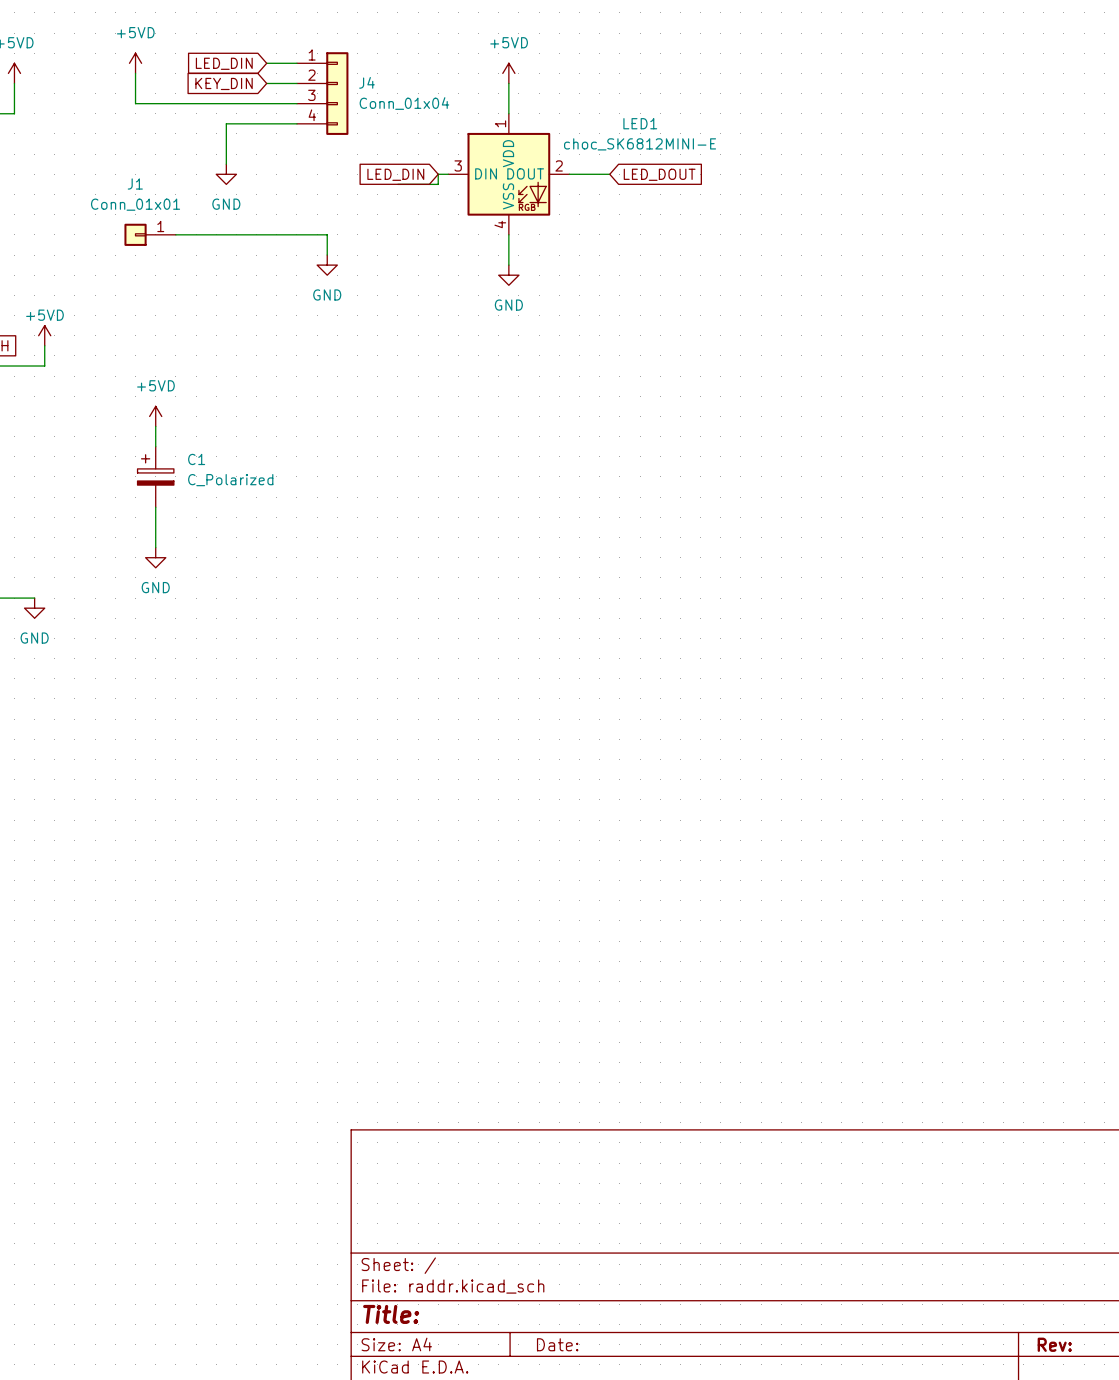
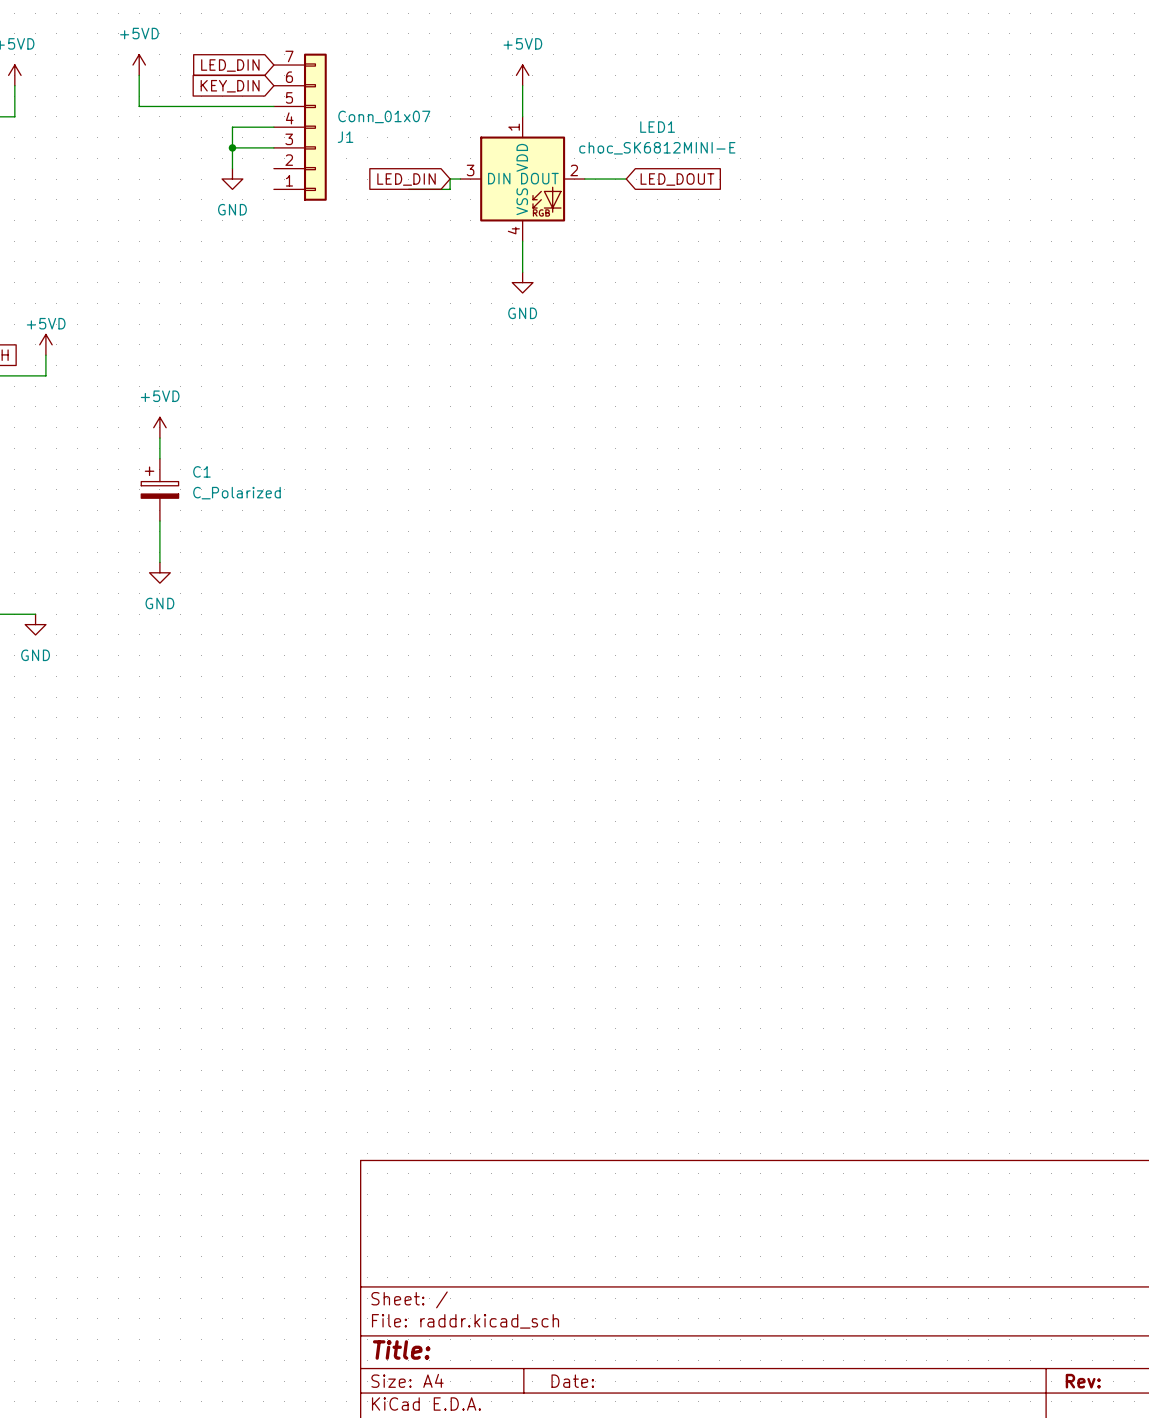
J4: Conn_01x04 (322, 93) -> none
wire: none -> (232, 147) (273, 147)
junction: none -> (232, 147)
J1 name position: J1 (135, 184) -> J1 (345, 137)
J1 value: Conn_01x01 (135, 204) -> Conn_01x07 (384, 116)
J1 symbol: [124, 223, 176, 246] -> [273, 53, 327, 201]
wire: (175, 234) (327, 234) (327, 255) -> none
power symbol: GND (327, 265) -> none

